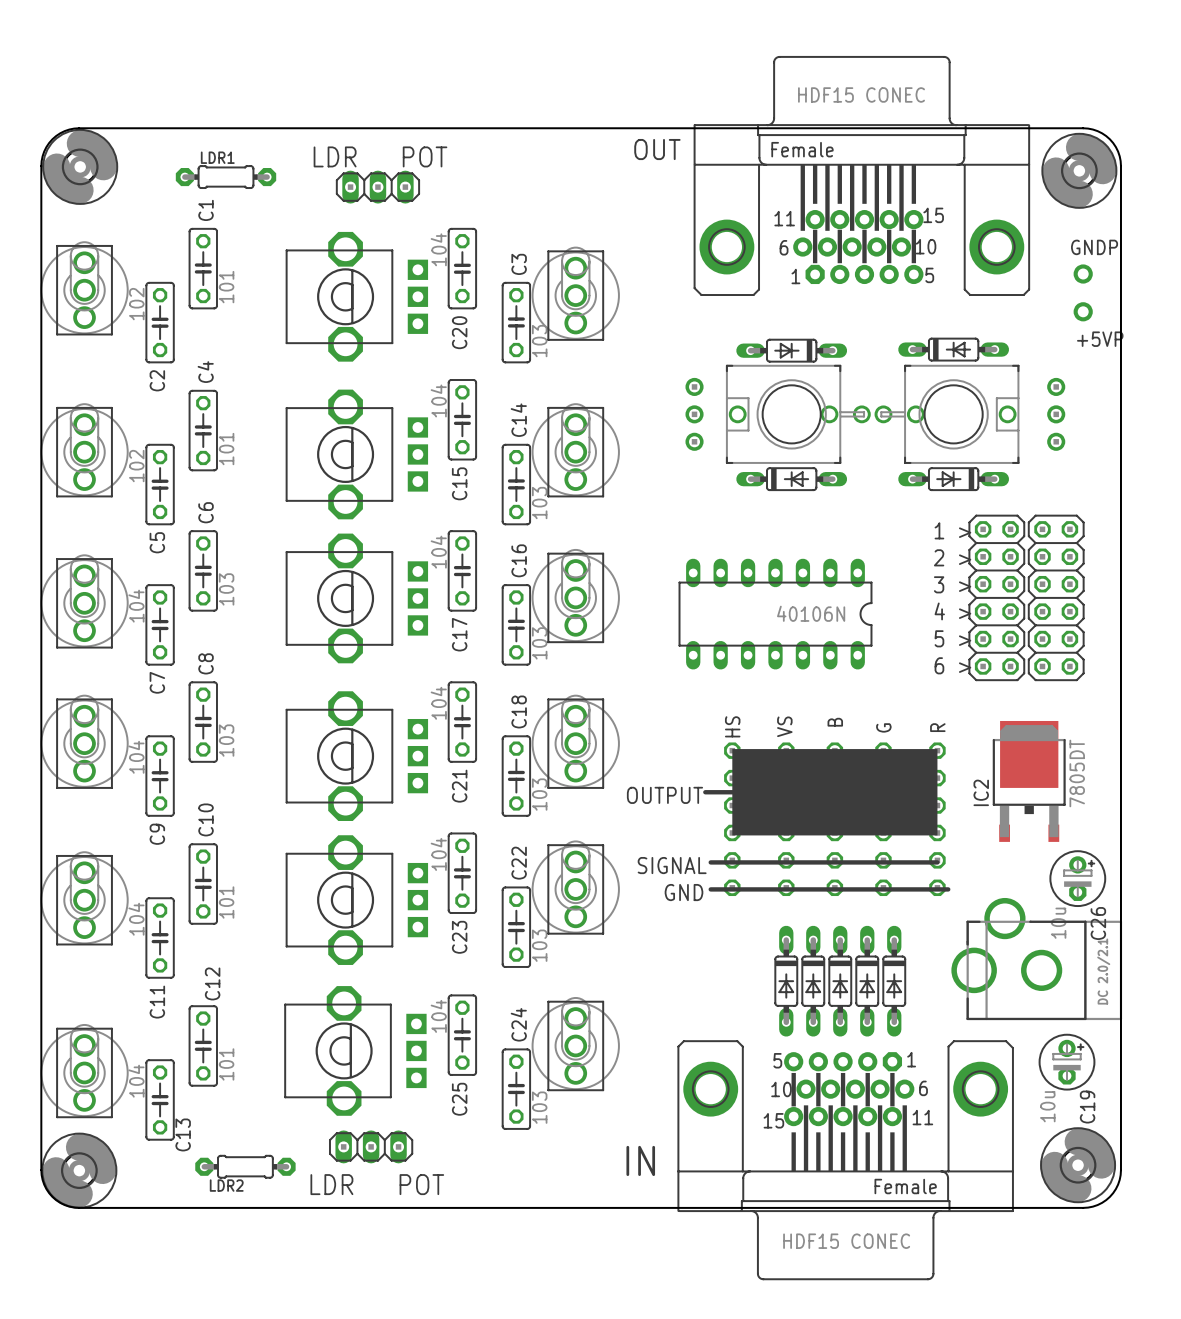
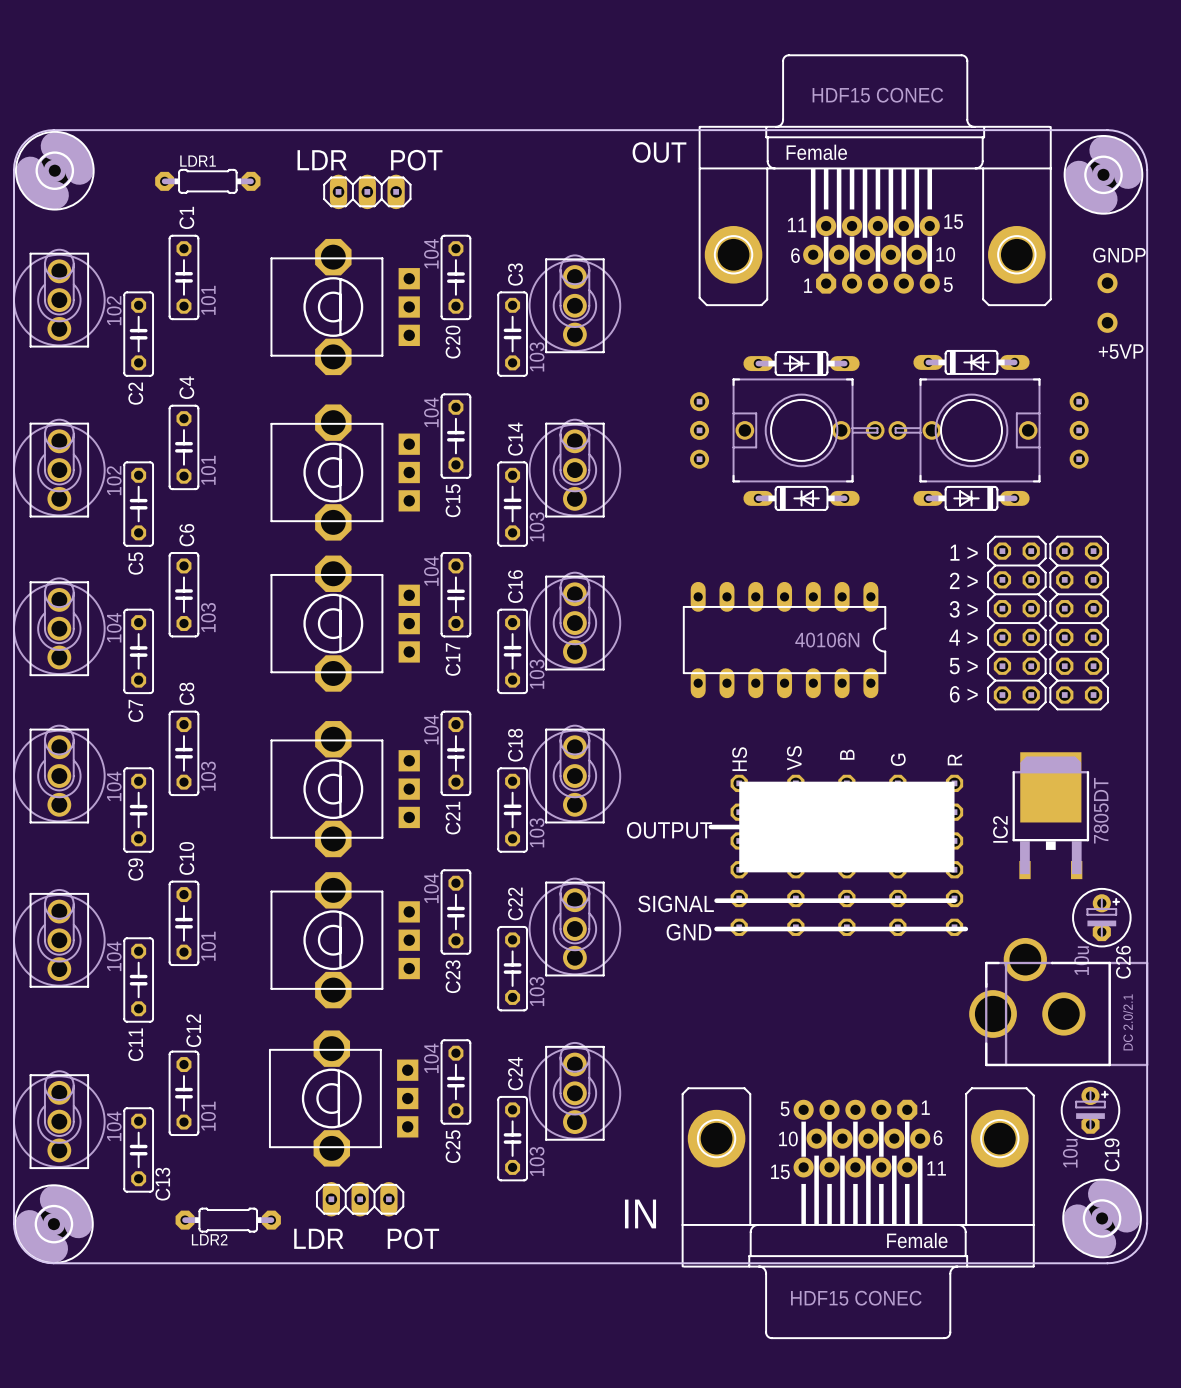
part: (786, 981) -> none
part: (813, 981) -> none
part: (840, 981) -> none
part: (867, 981) -> none
part: (894, 981) -> none

